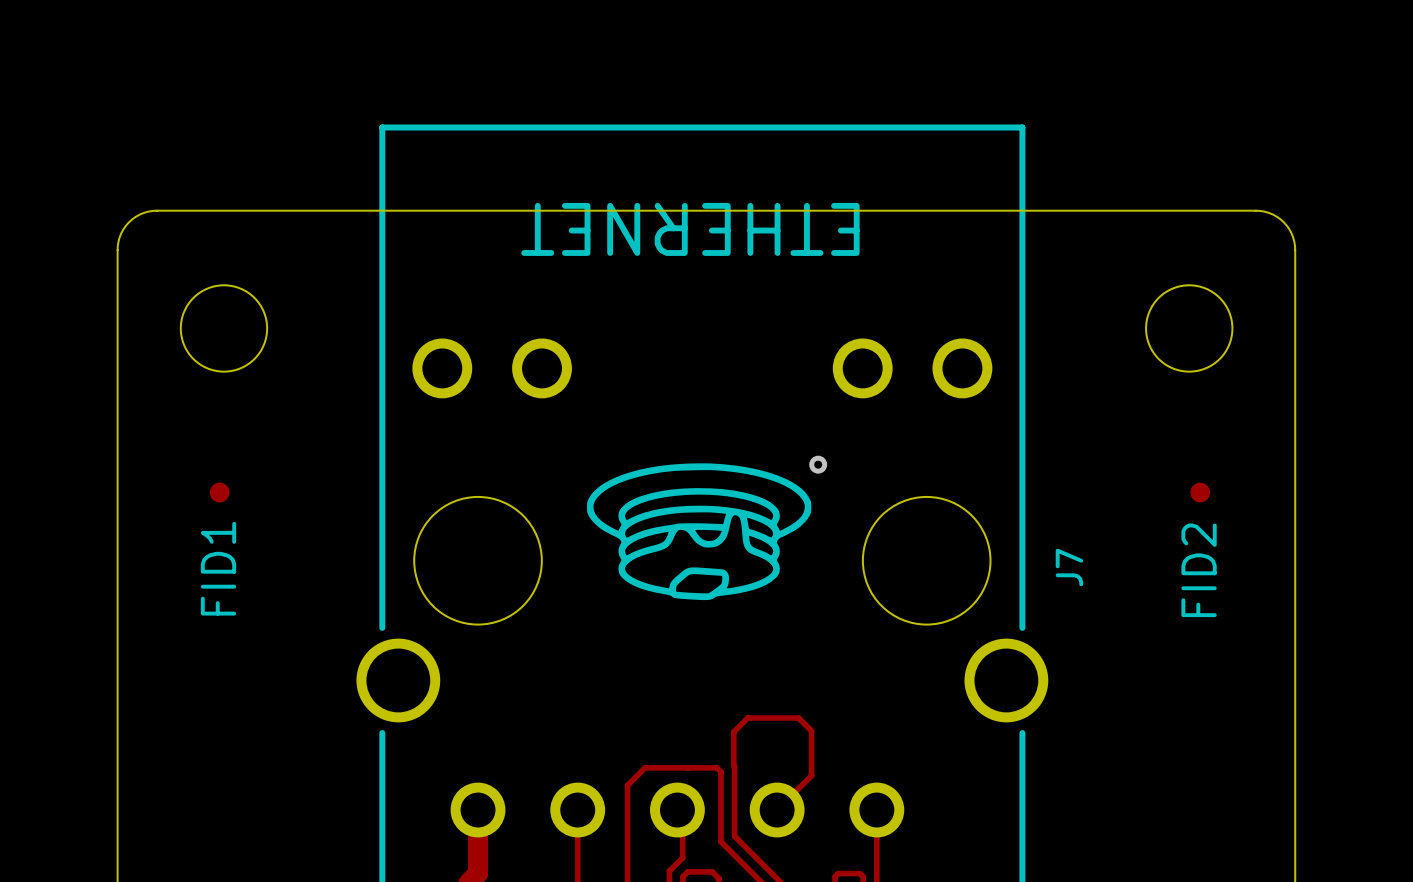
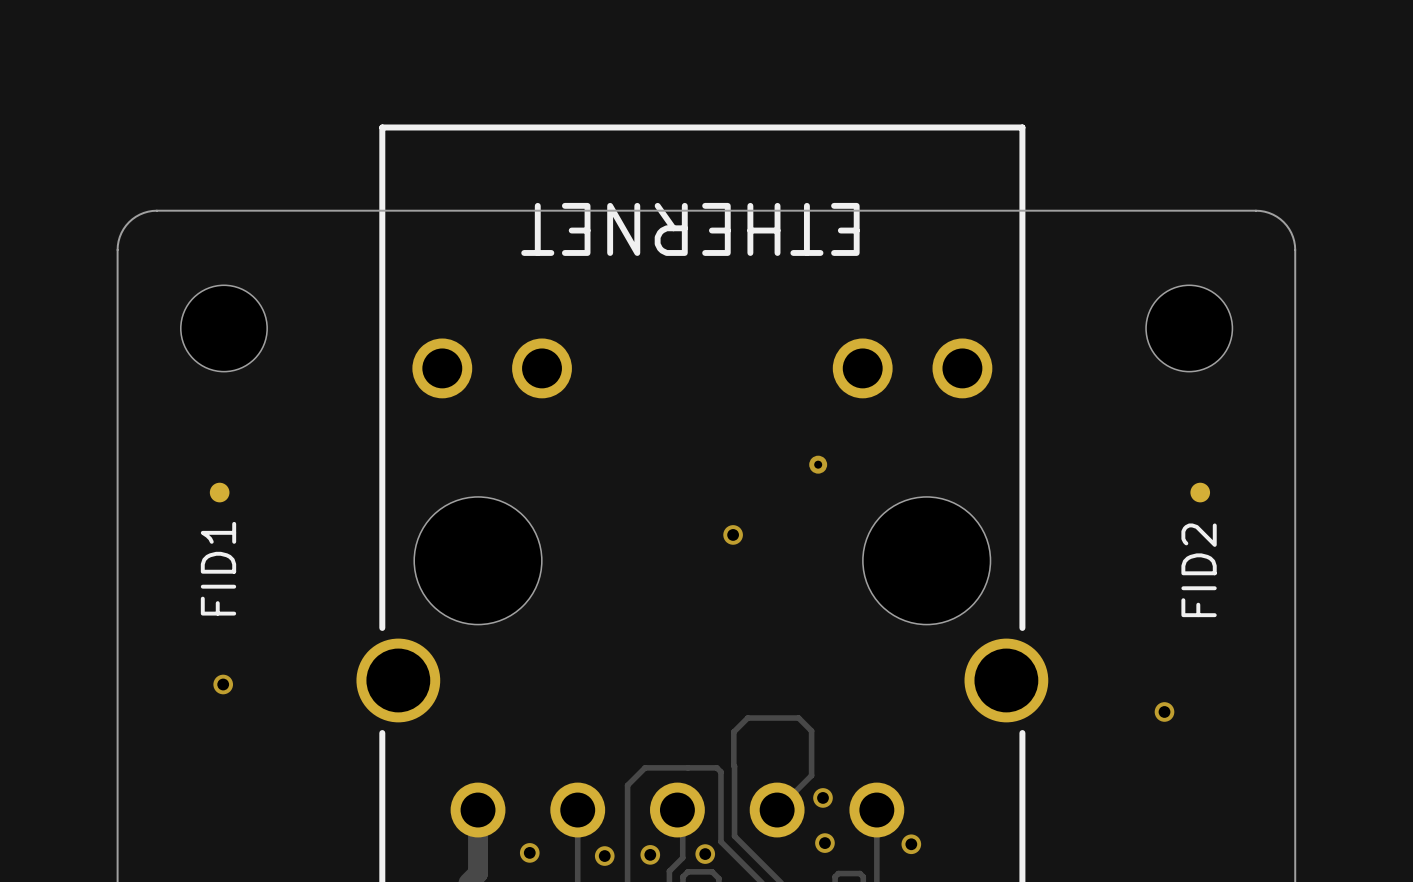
drawing: [587, 463, 812, 601] -> none
via: none -> (733, 534)
J7 name: J7 (1069, 567) -> none
via: none -> (223, 684)
via: none -> (1164, 711)
via: none -> (823, 797)
via: none -> (824, 843)
via: none -> (911, 844)
via: none -> (529, 852)
via: none -> (650, 854)
via: none -> (705, 854)
via: none -> (604, 856)

